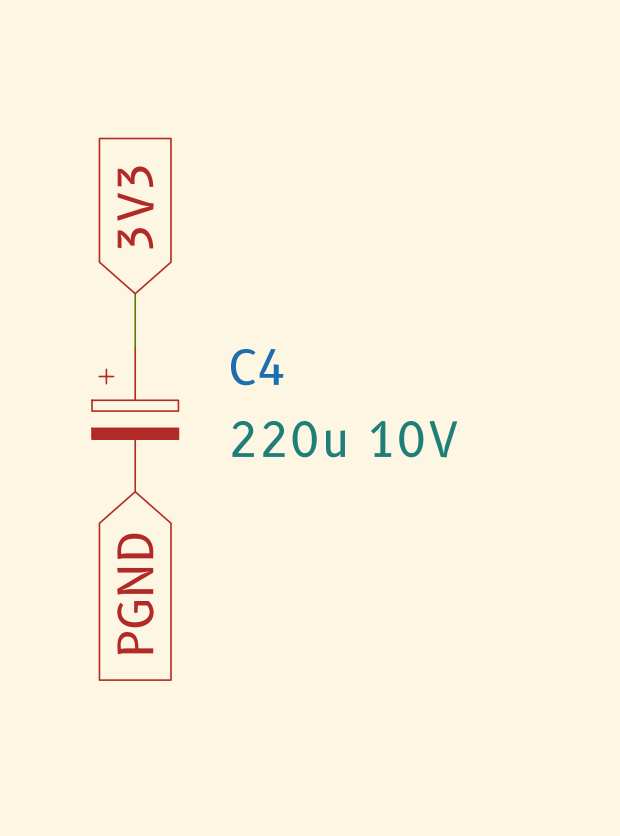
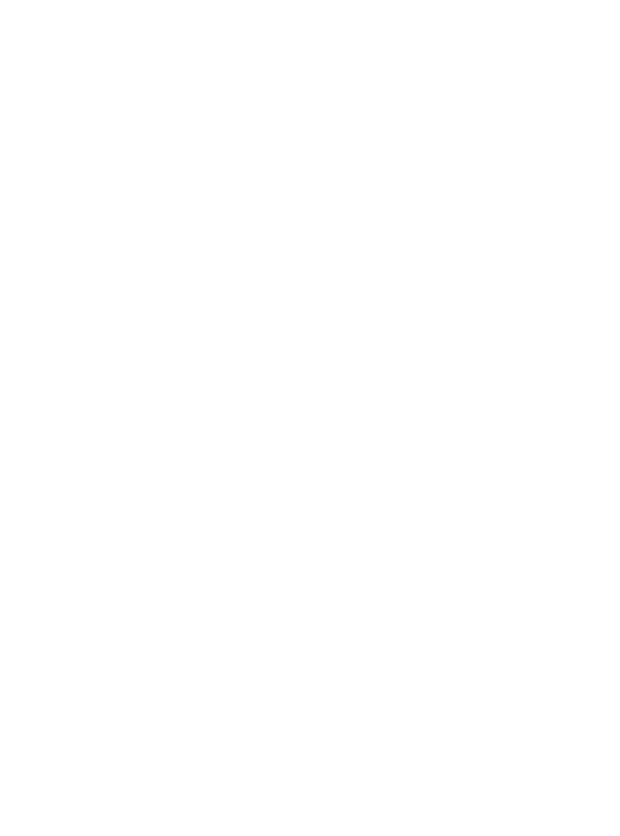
global label: 3V3 (135, 207) -> none
wire: (135, 293) (135, 347) -> none
C4: 220u 10V (135, 419) -> none
global label: PGND (135, 593) -> none

